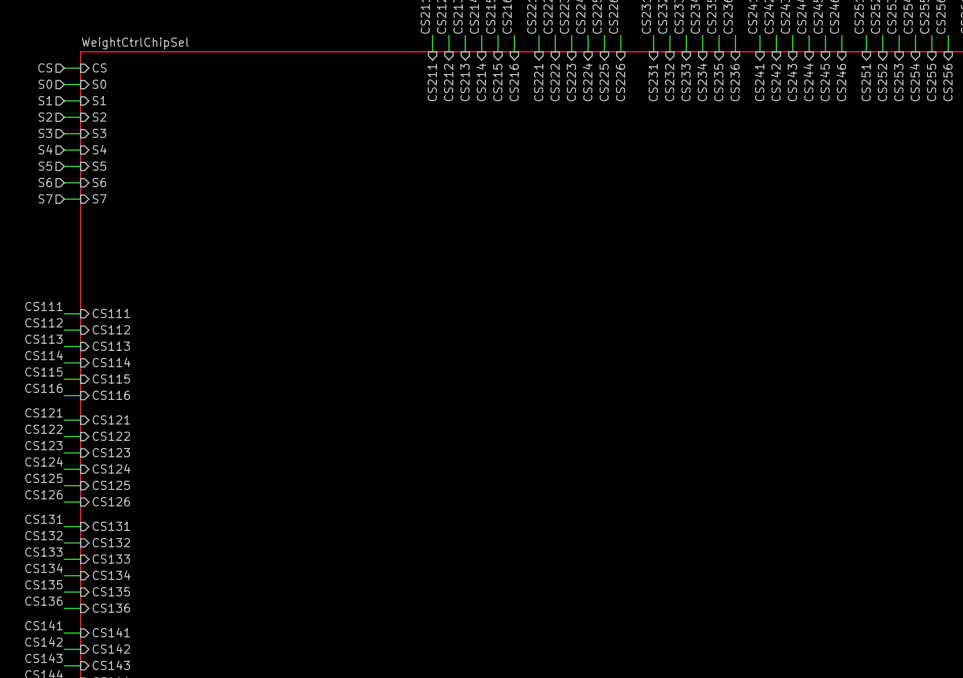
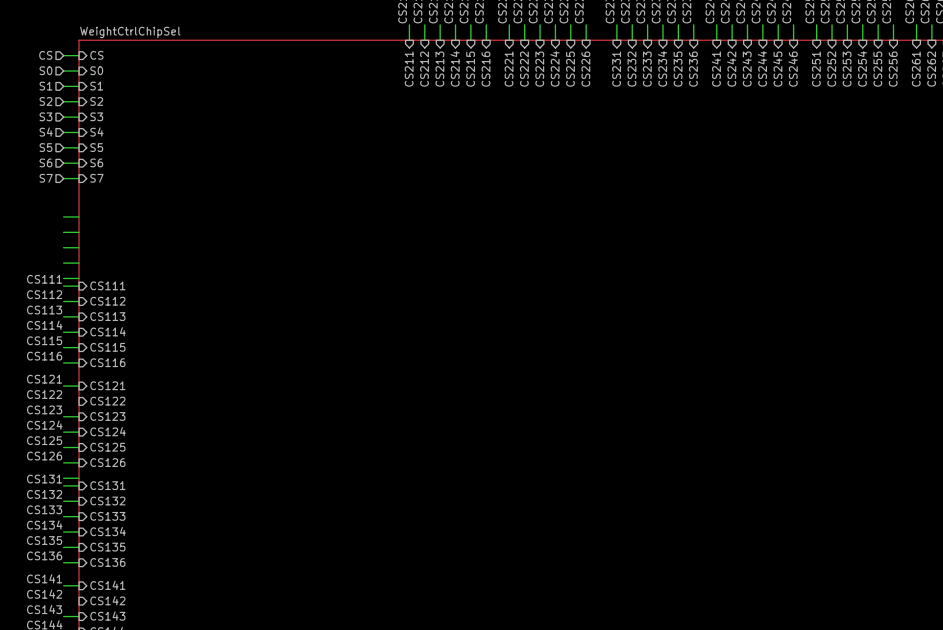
wire: none -> (63, 216) (79, 216)
wire: none -> (63, 232) (79, 232)
wire: none -> (63, 247) (79, 247)
wire: none -> (63, 263) (79, 263)
wire: (64, 436) (80, 436) -> (63, 278) (79, 278)
wire: (64, 649) (80, 649) -> (63, 478) (79, 478)

